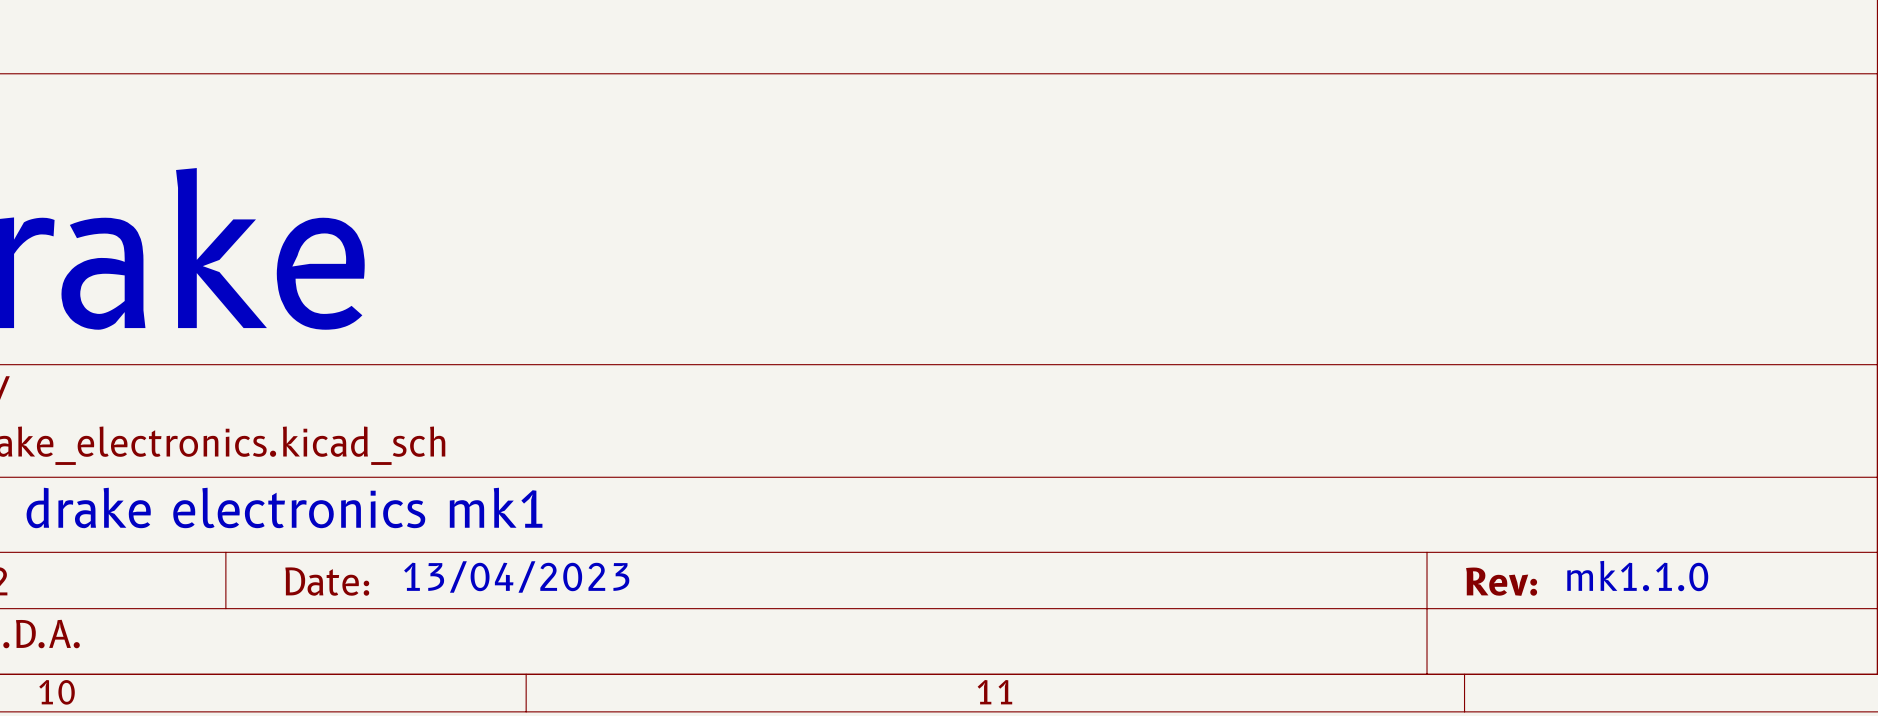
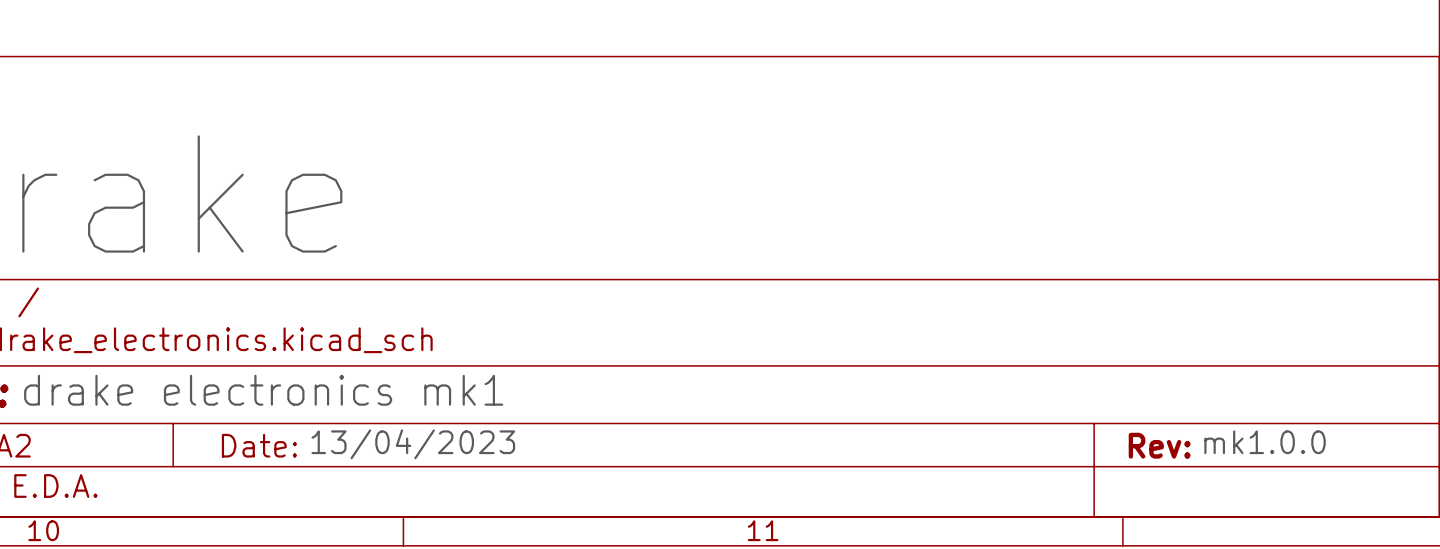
text: mk1.1.0 (1637, 576) -> mk1.0.0 (1265, 442)

